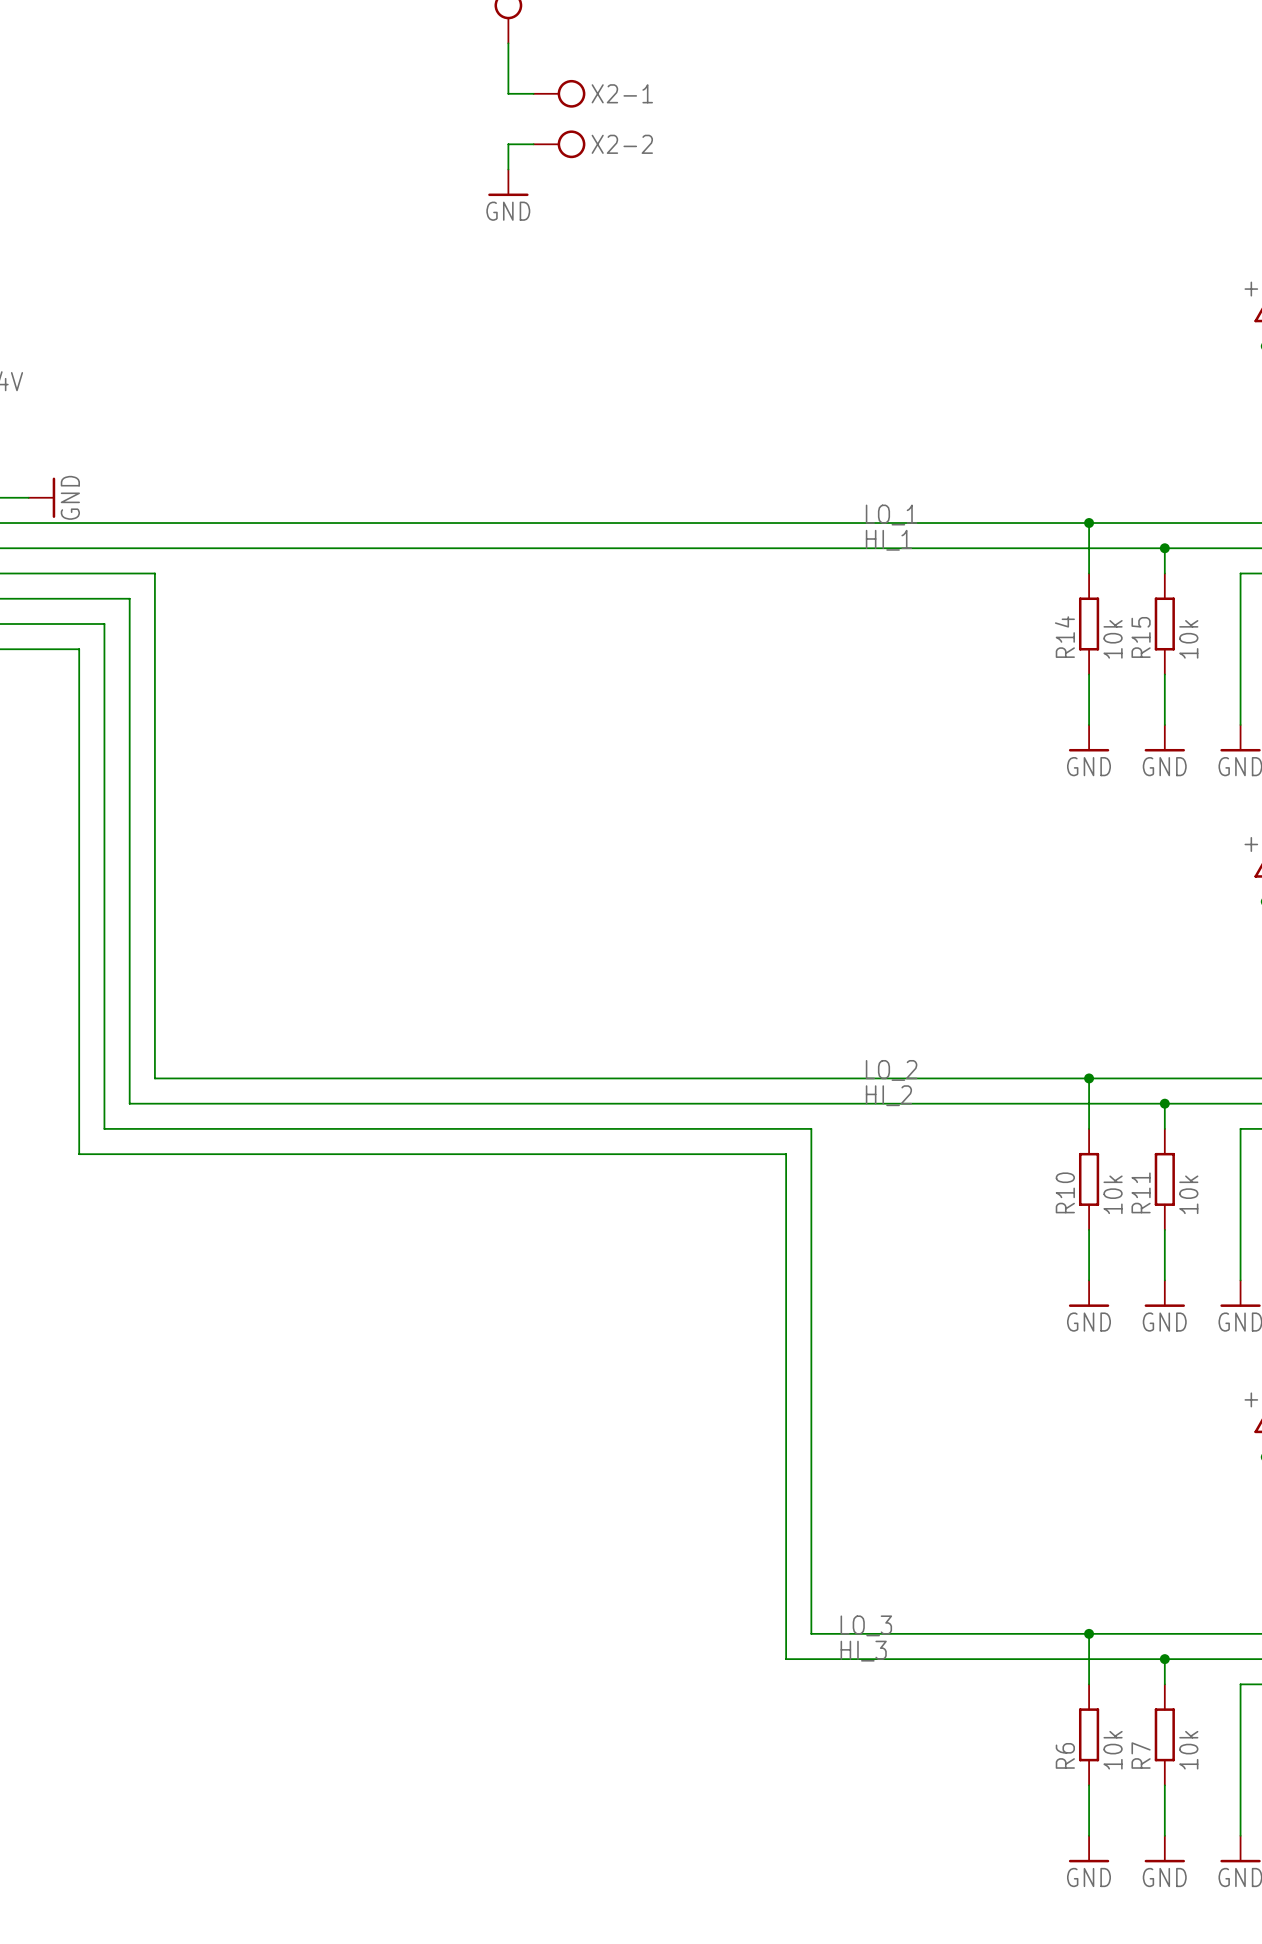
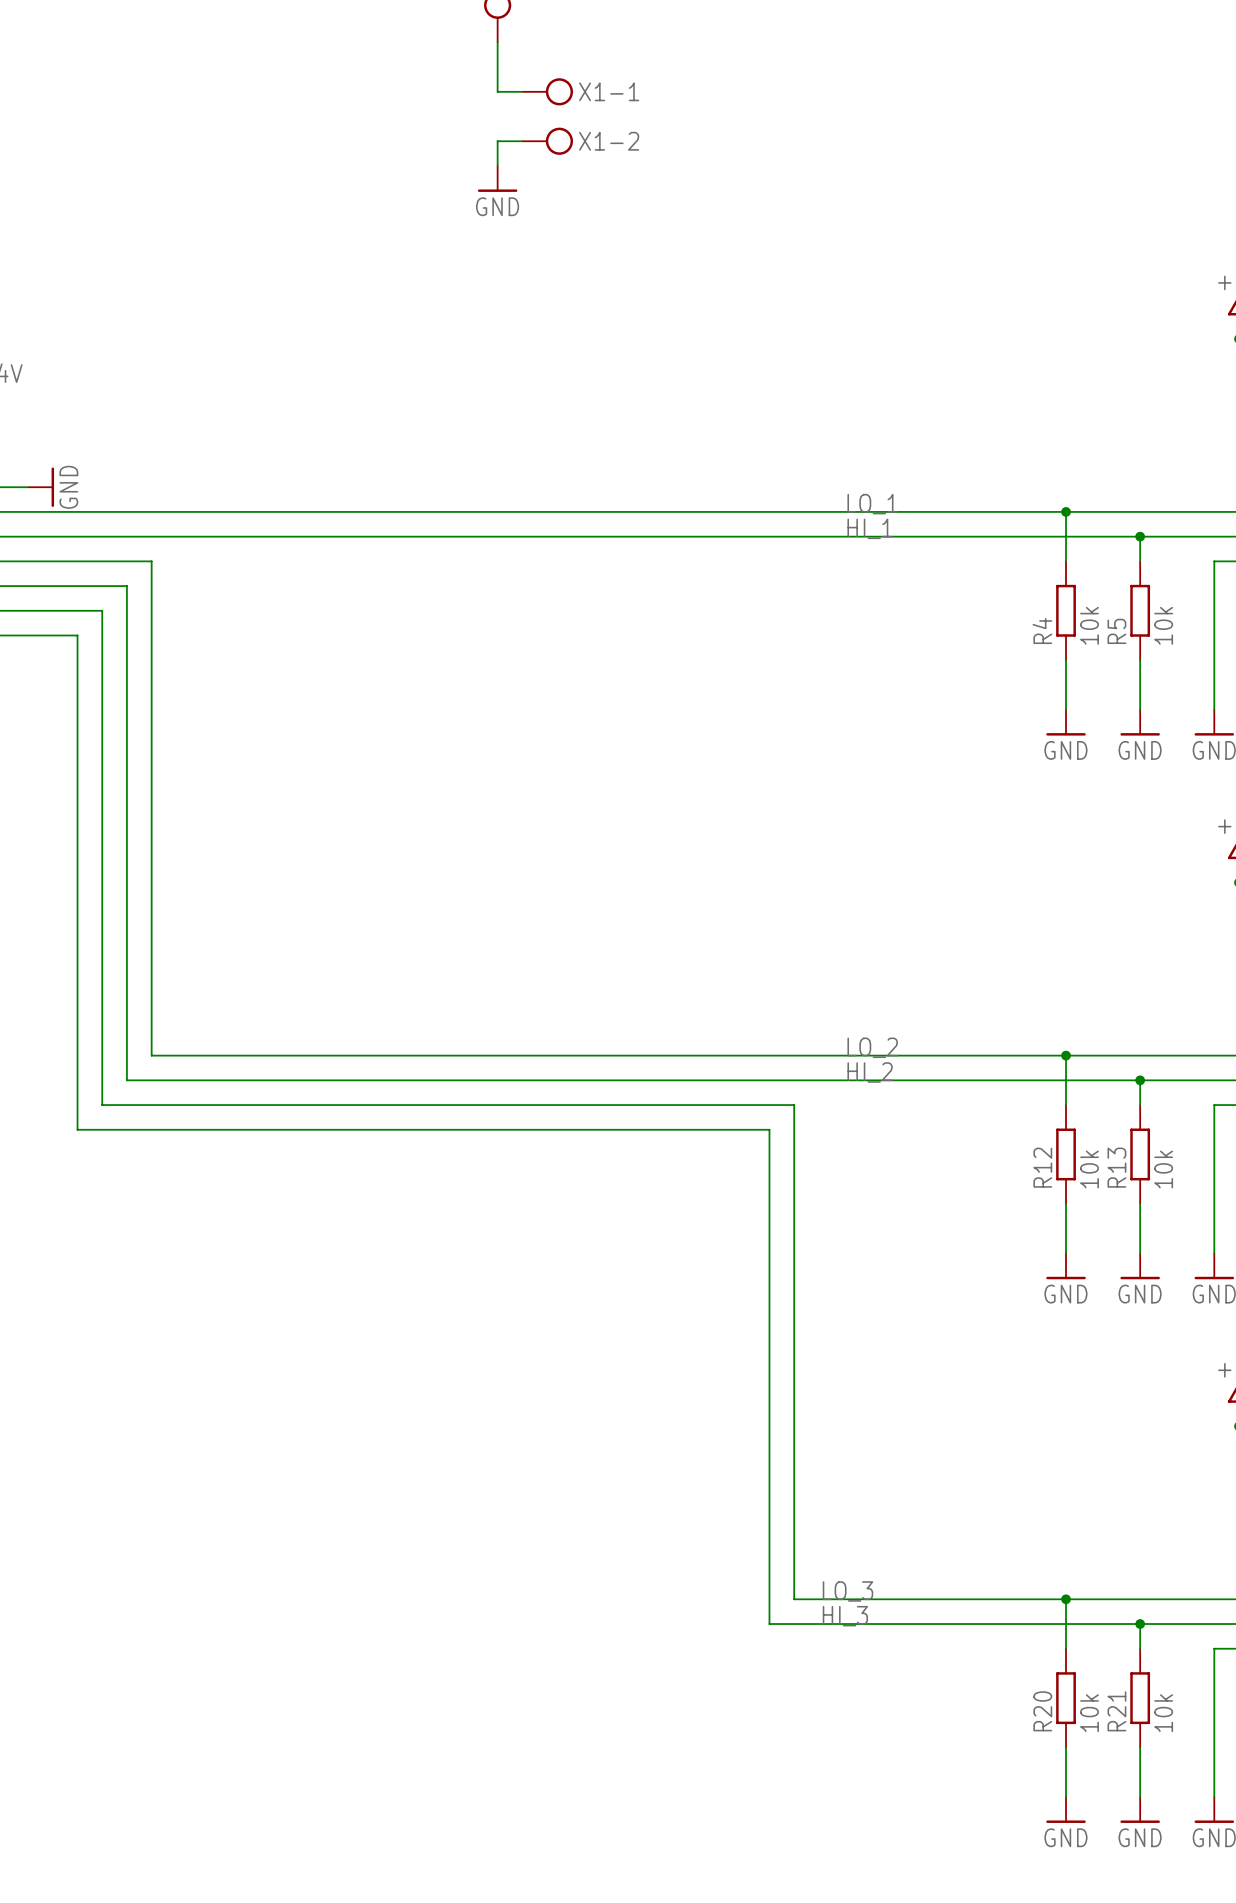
X2-1 name: X2-1 (622, 93) -> X1-1 (609, 91)
X2-2 name: X2-2 (622, 144) -> X1-2 (609, 141)
R14 name: R14 (1064, 637) -> R4 (1042, 631)
R15 name: R15 (1141, 637) -> R5 (1116, 631)
R10 name: R10 (1065, 1192) -> R12 (1042, 1167)
R11 name: R11 (1141, 1192) -> R13 (1116, 1167)
R6 name: R6 (1065, 1755) -> R20 (1042, 1711)
R7 name: R7 (1141, 1755) -> R21 (1116, 1711)

